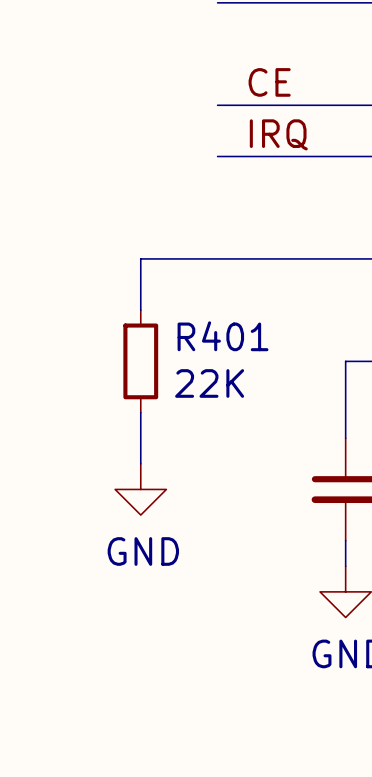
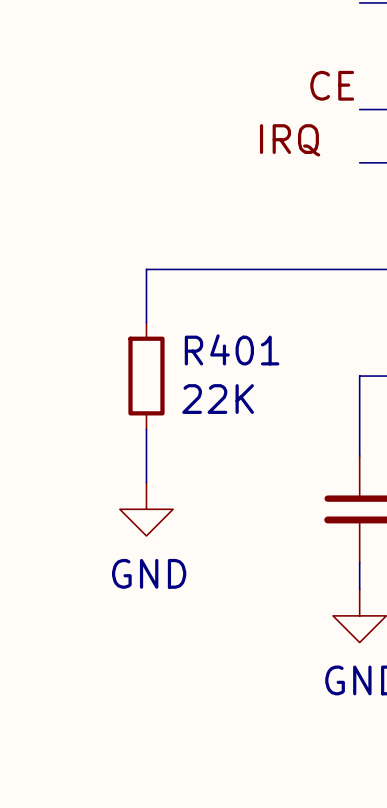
wire: (217, 2) (345, 2) -> none
label position: CE (269, 82) -> CE (332, 85)
wire: (217, 105) (345, 105) -> none
wire: (217, 156) (345, 156) -> none

